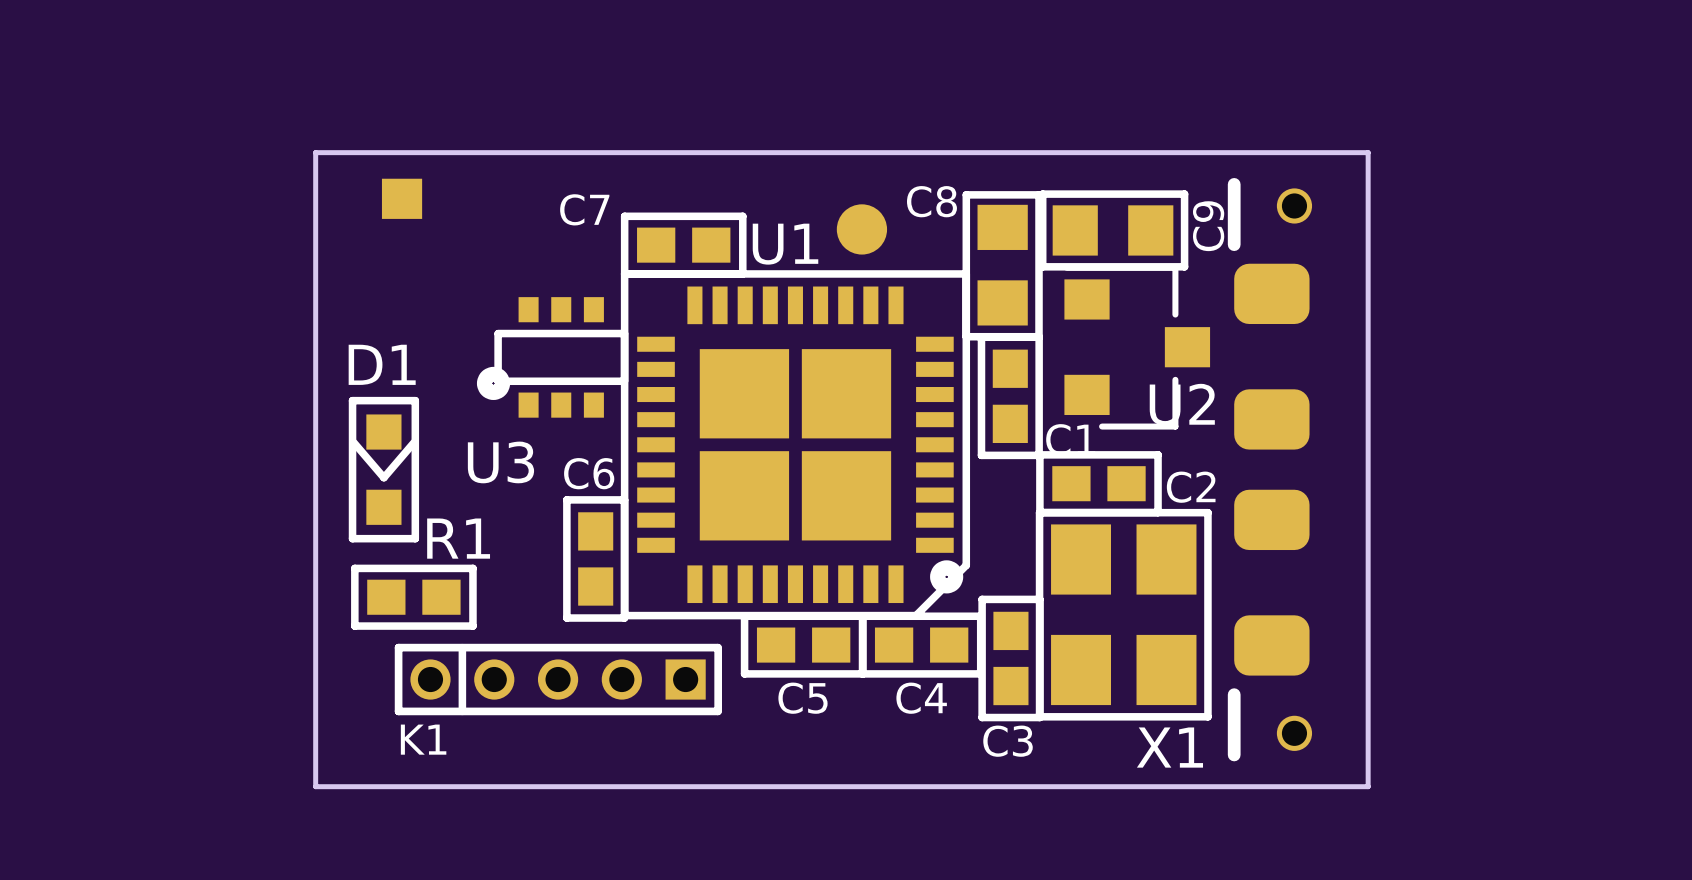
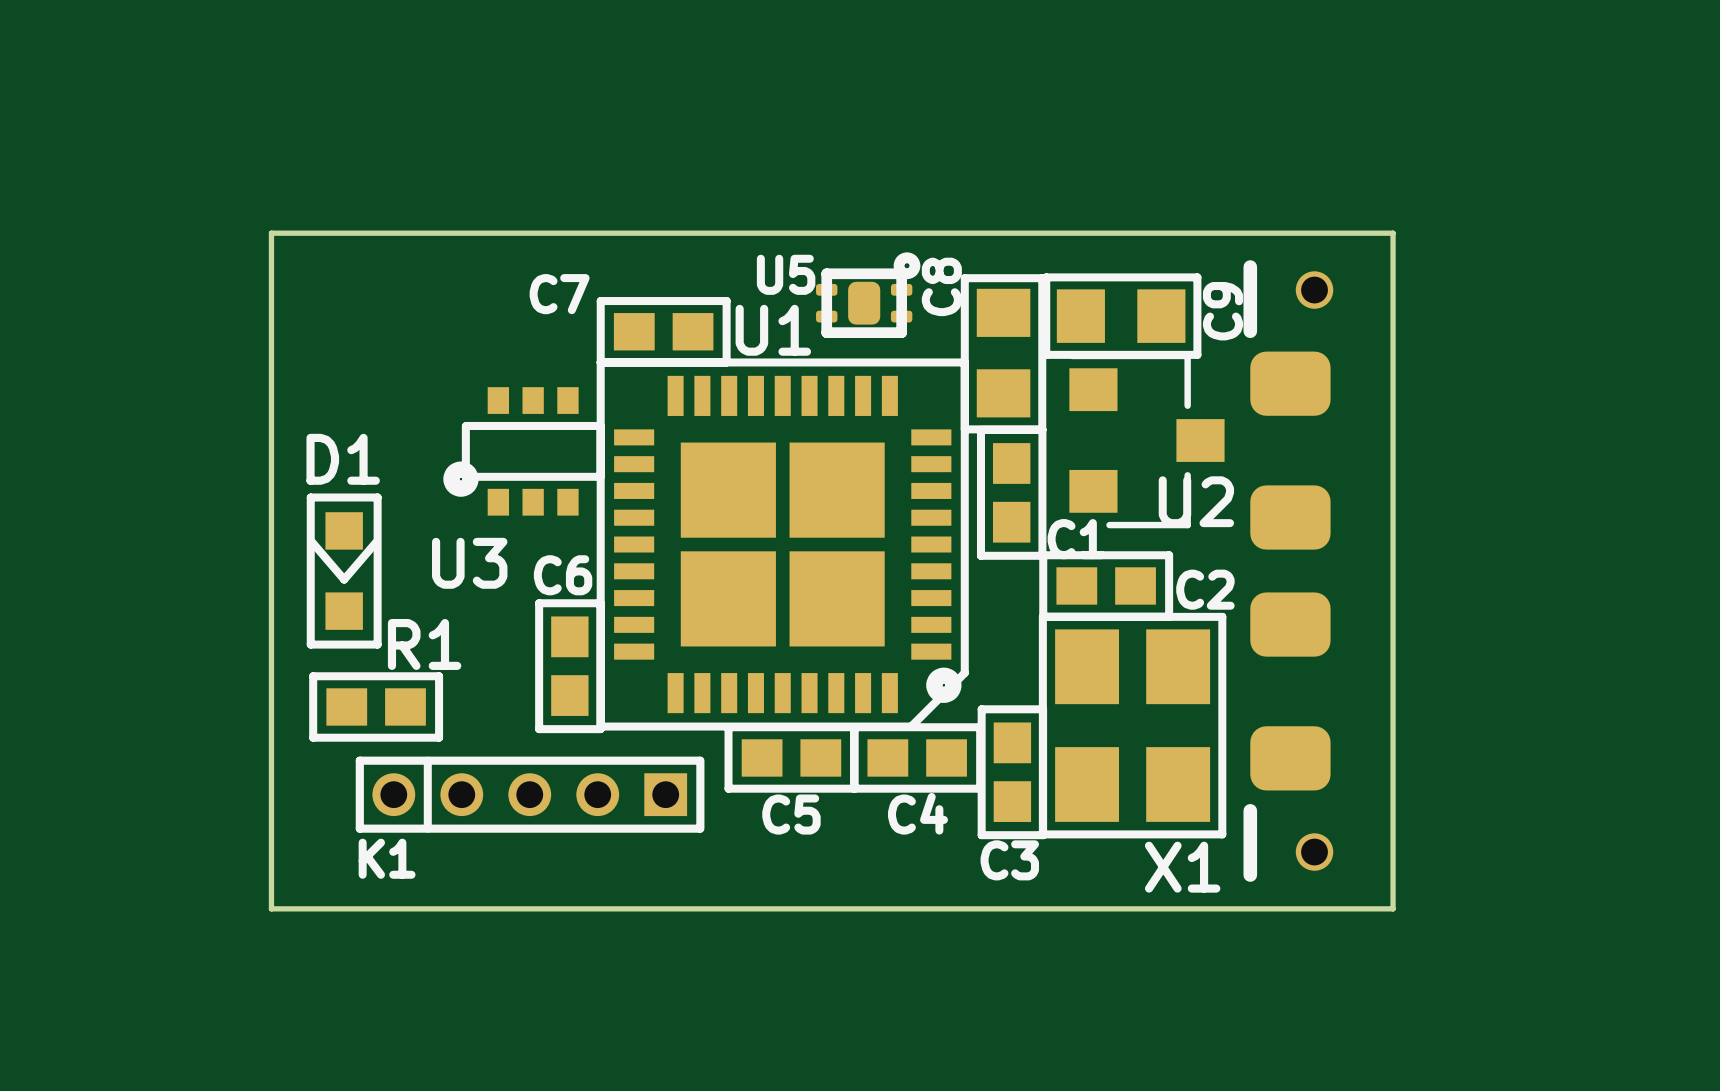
part: (402, 198) -> none
C8 name rotation: 0° (931, 201) -> 90° counterclockwise (941, 286)
U5: none -> (868, 295)
part: (861, 229) -> none

